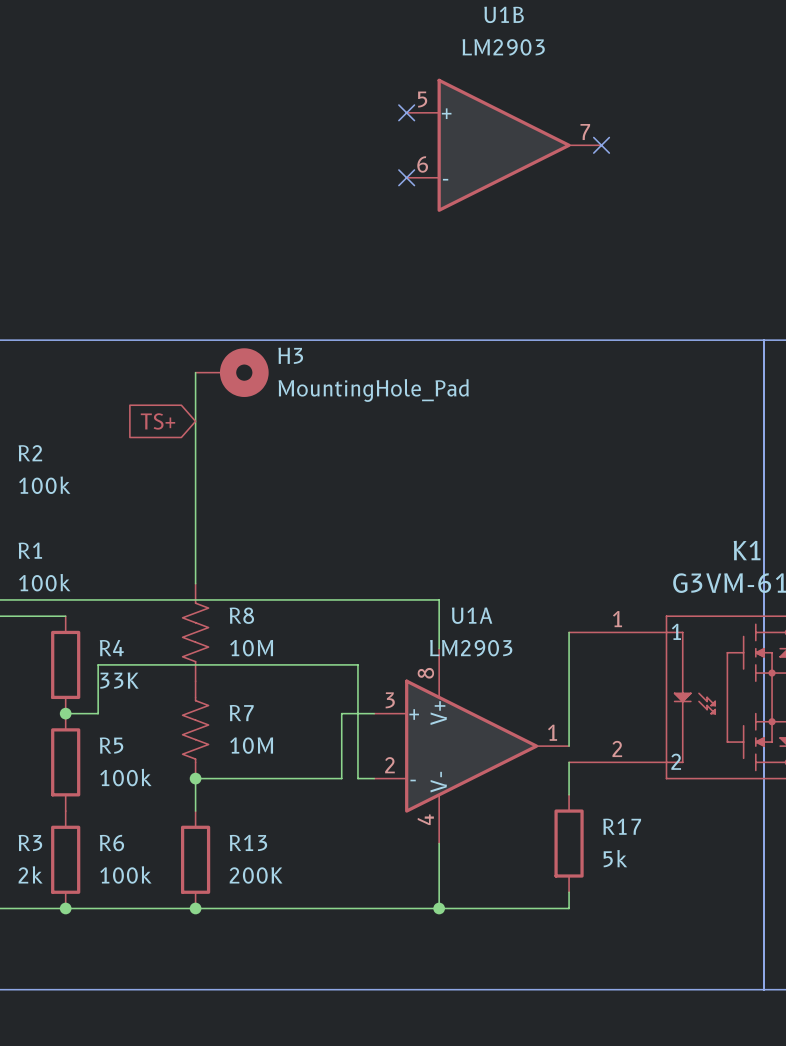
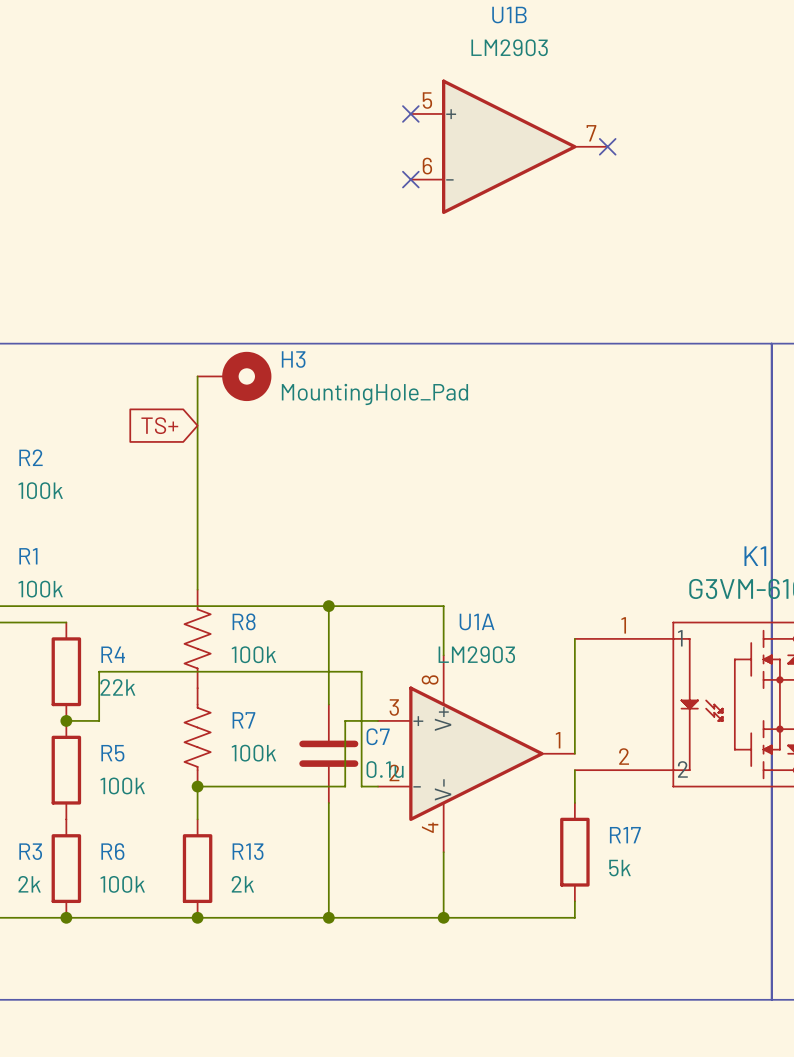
wire: none -> (328, 606) (328, 704)
junction: none -> (328, 606)
R8 value: 10M (251, 648) -> 100k (253, 654)
R4 value: 33K (119, 680) -> 22k (117, 687)
R7 value: 10M (251, 745) -> 100k (253, 753)
C7: none -> 0.1u (328, 753)
wire: none -> (328, 802) (328, 917)
R13 value: 200K (256, 875) -> 2k (242, 884)
junction: none -> (328, 917)

